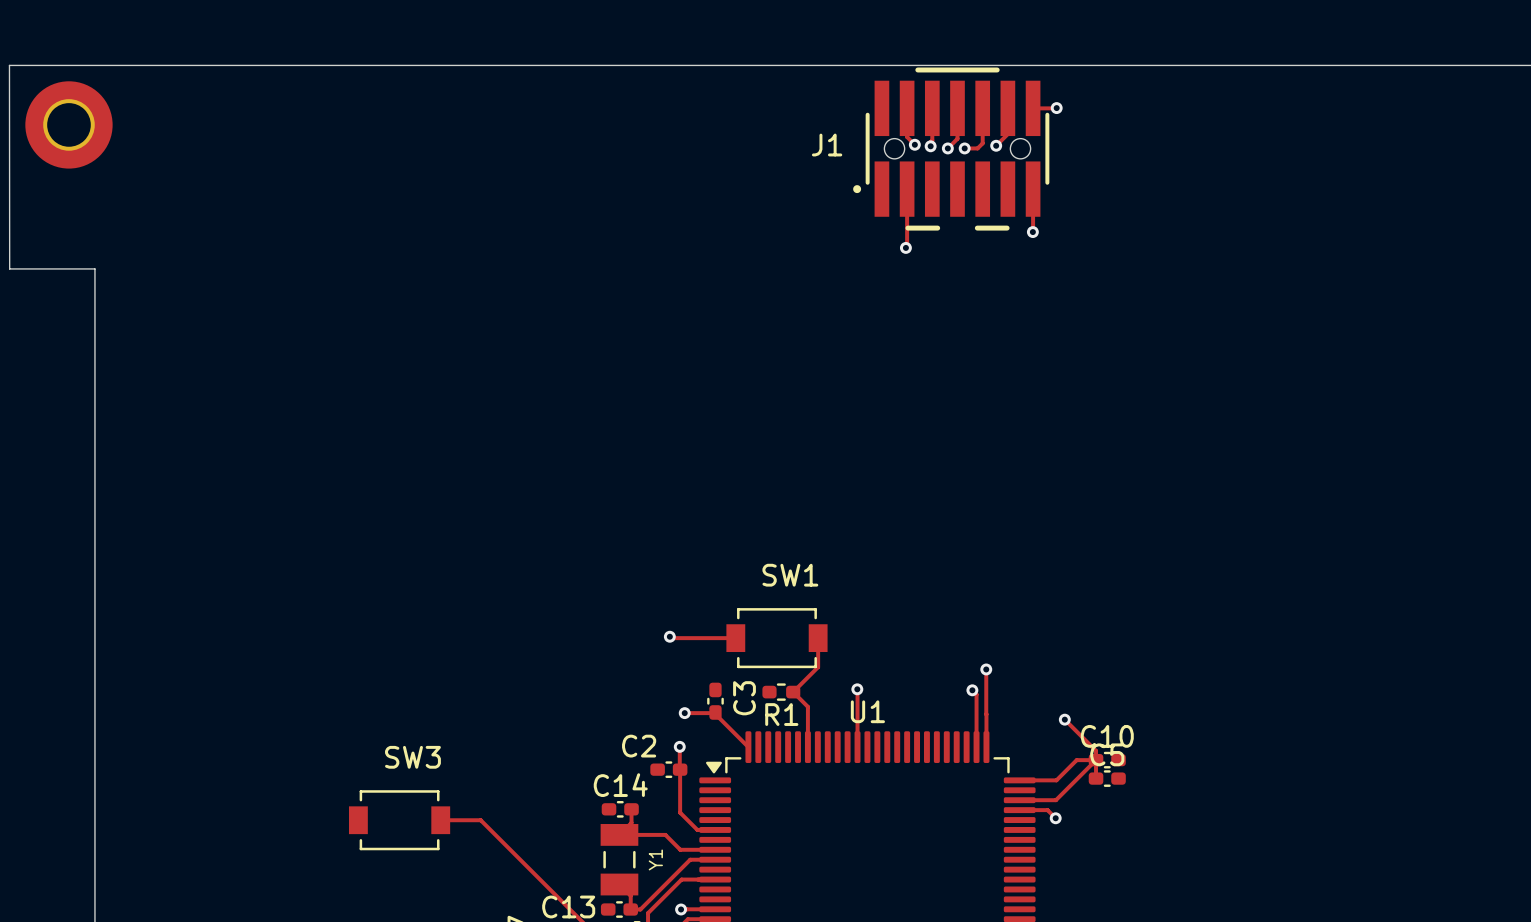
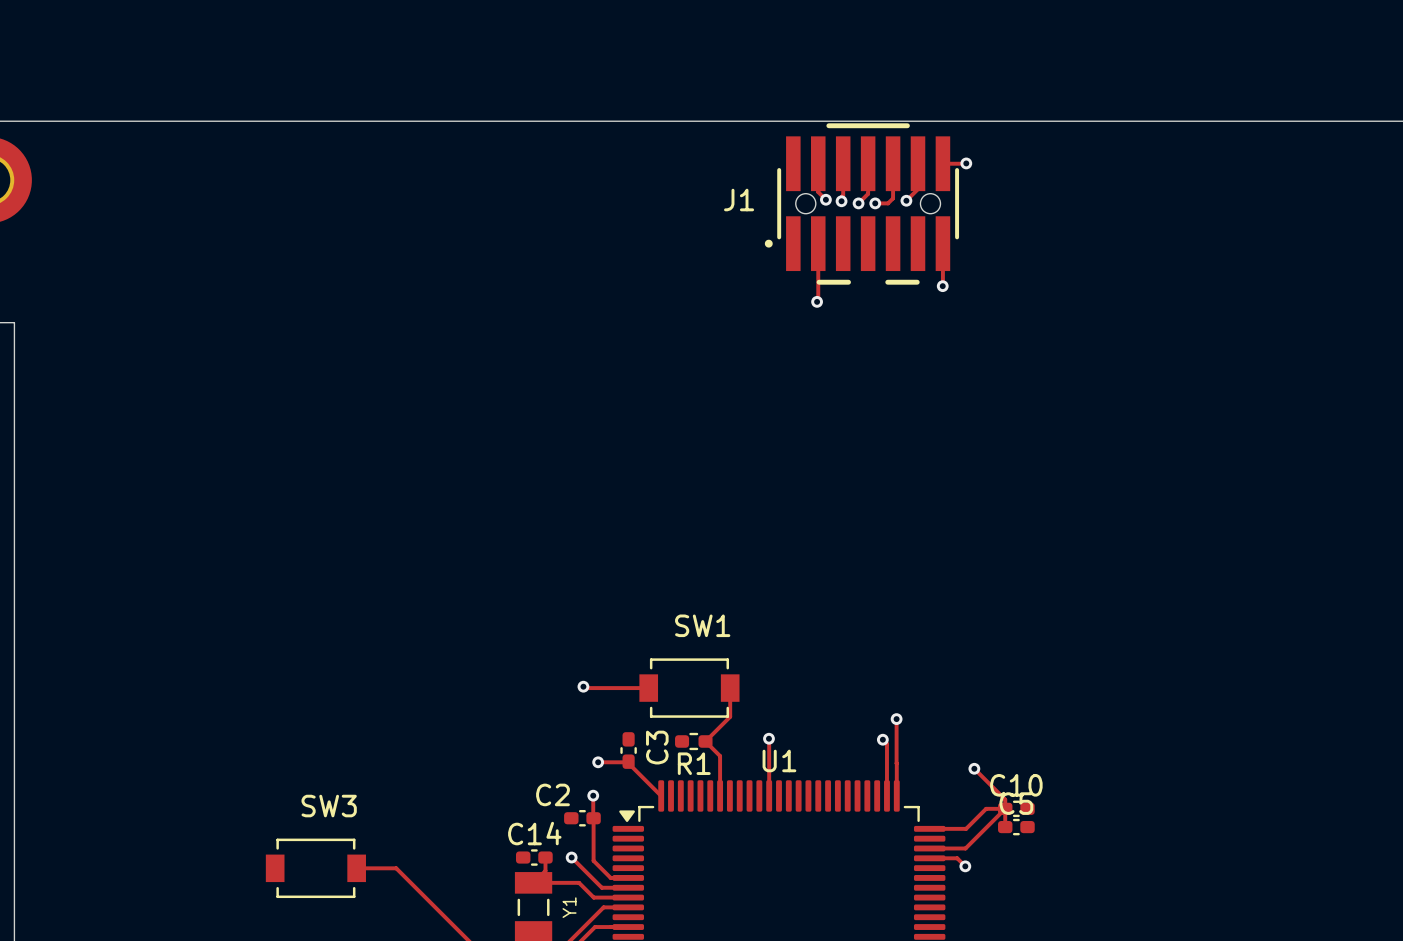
track: none -> (571, 857) (601, 887) (628, 887)
via: none -> (571, 857)

